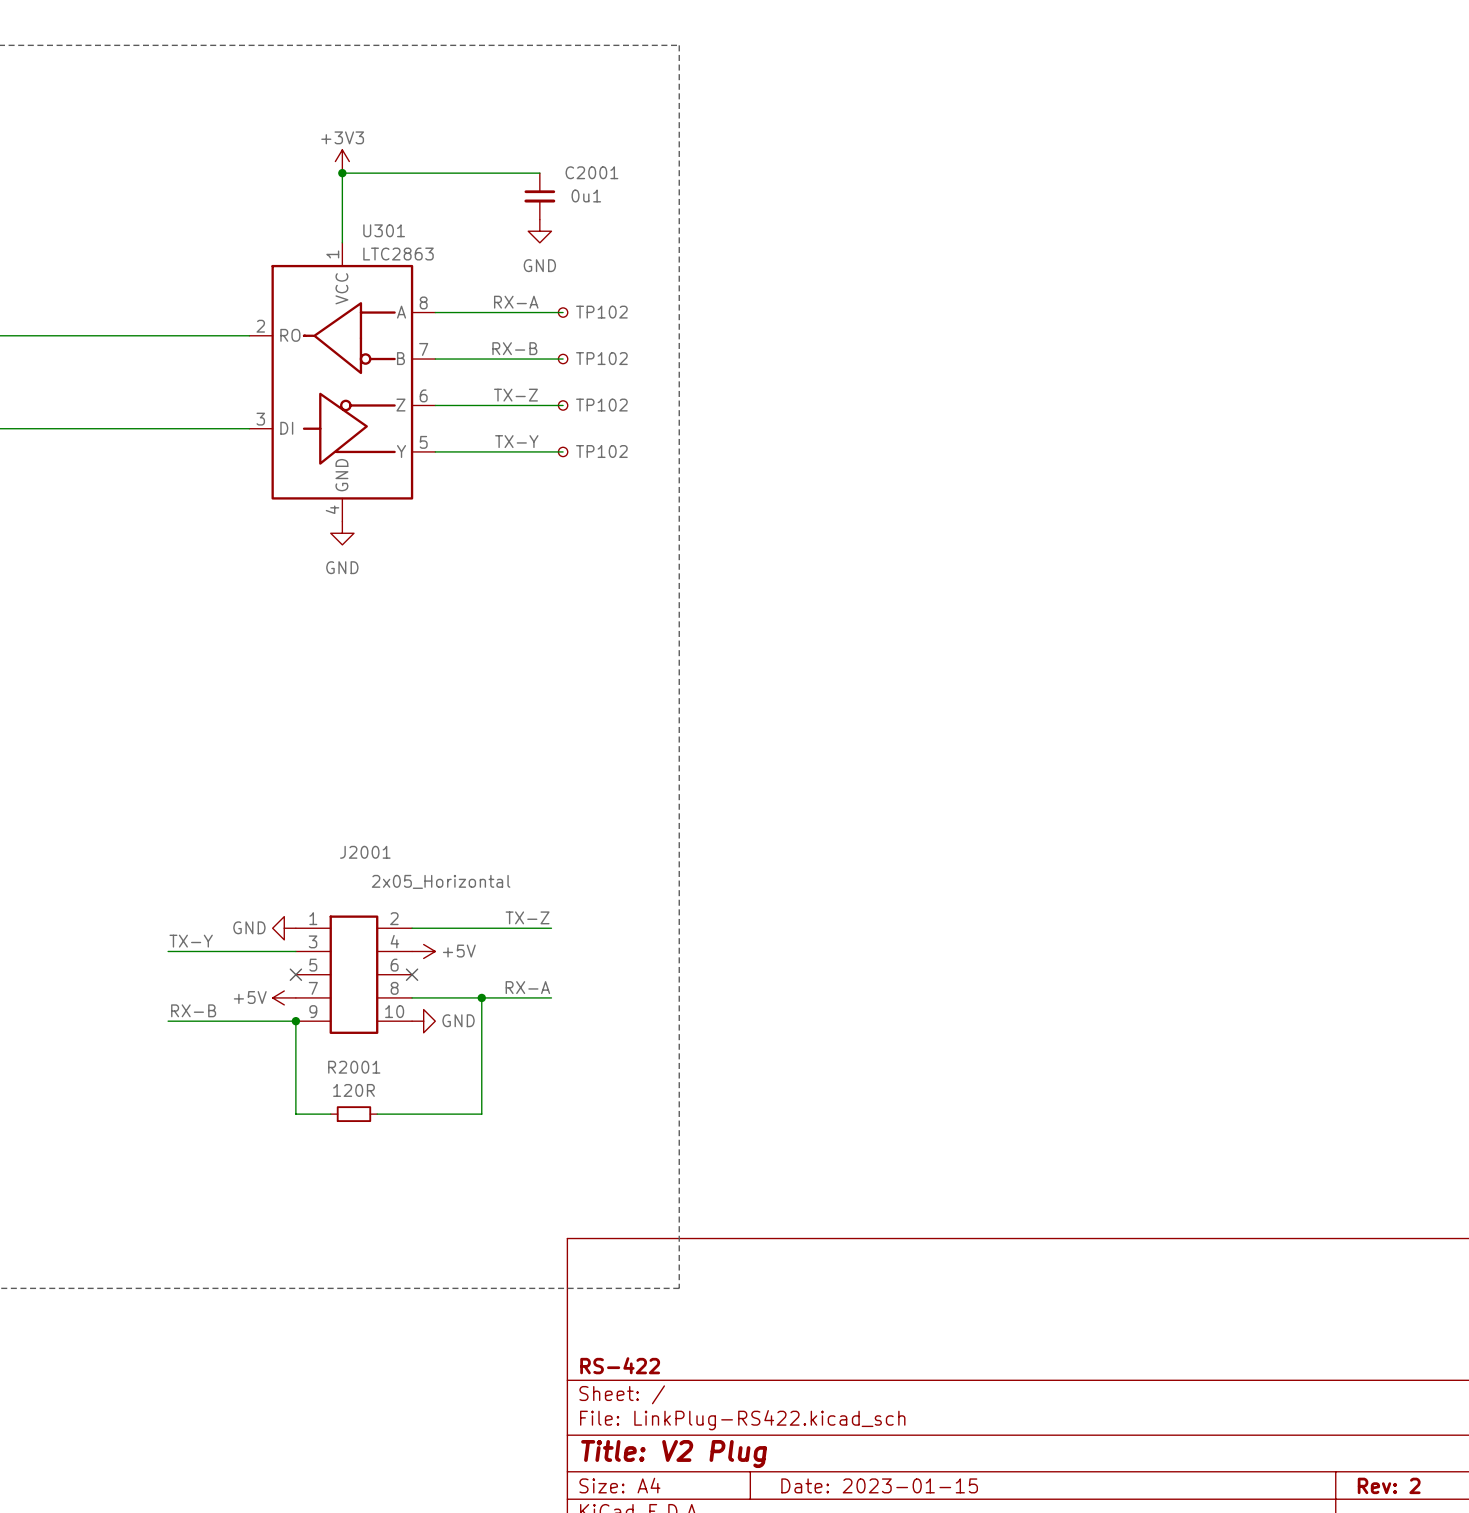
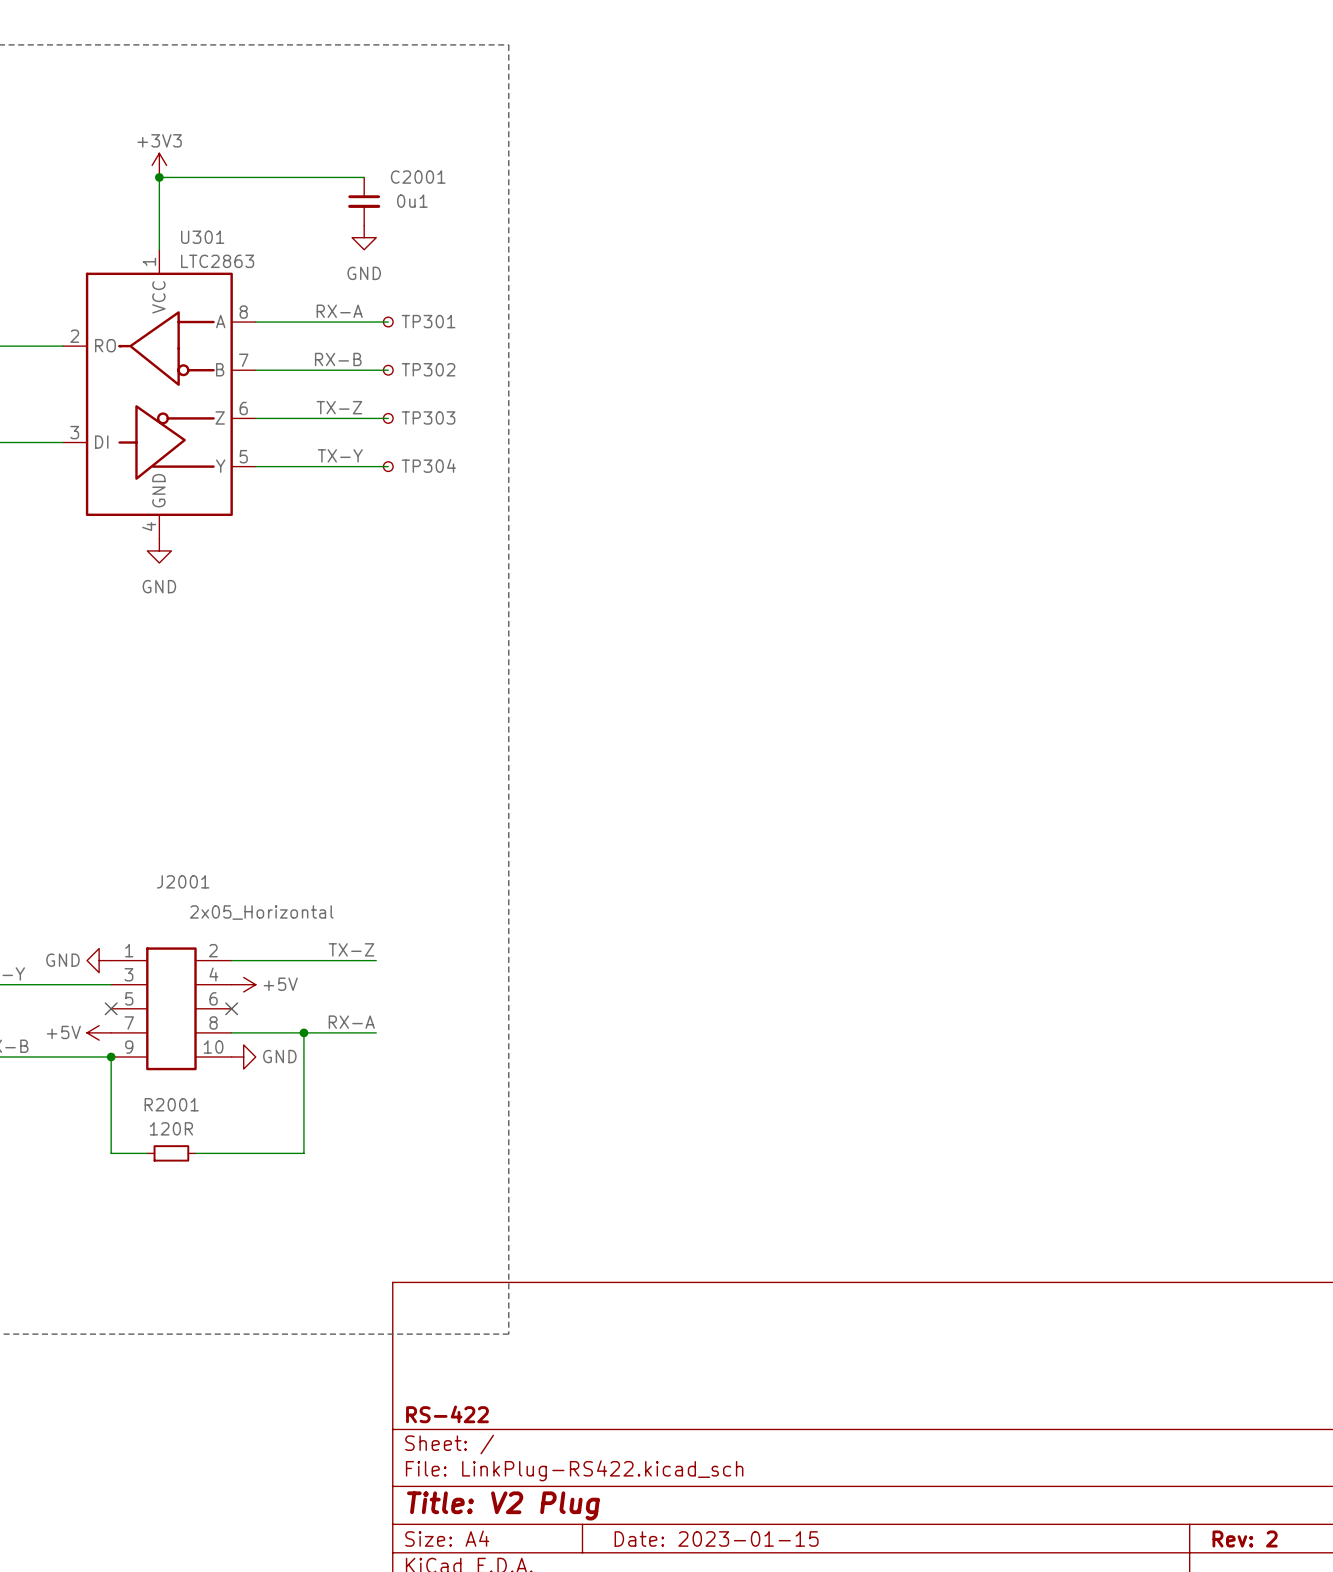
TP102 name: TP102 (601, 312) -> TP301 (428, 321)
TP102 name: TP102 (601, 358) -> TP302 (428, 369)
TP102 name: TP102 (601, 405) -> TP303 (428, 417)
TP102 name: TP102 (601, 451) -> TP304 (428, 465)

